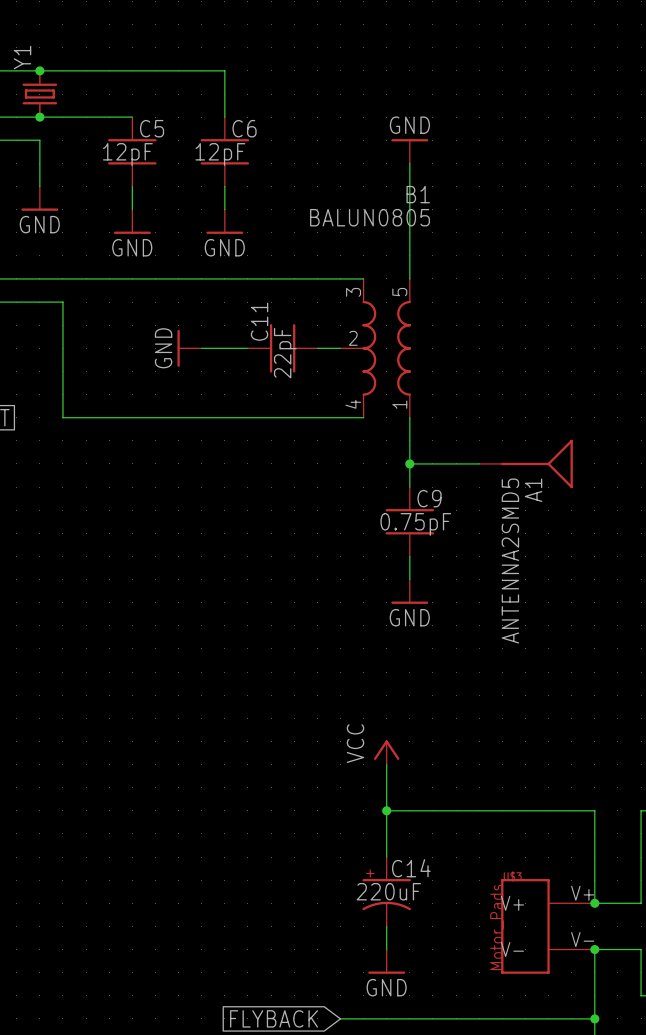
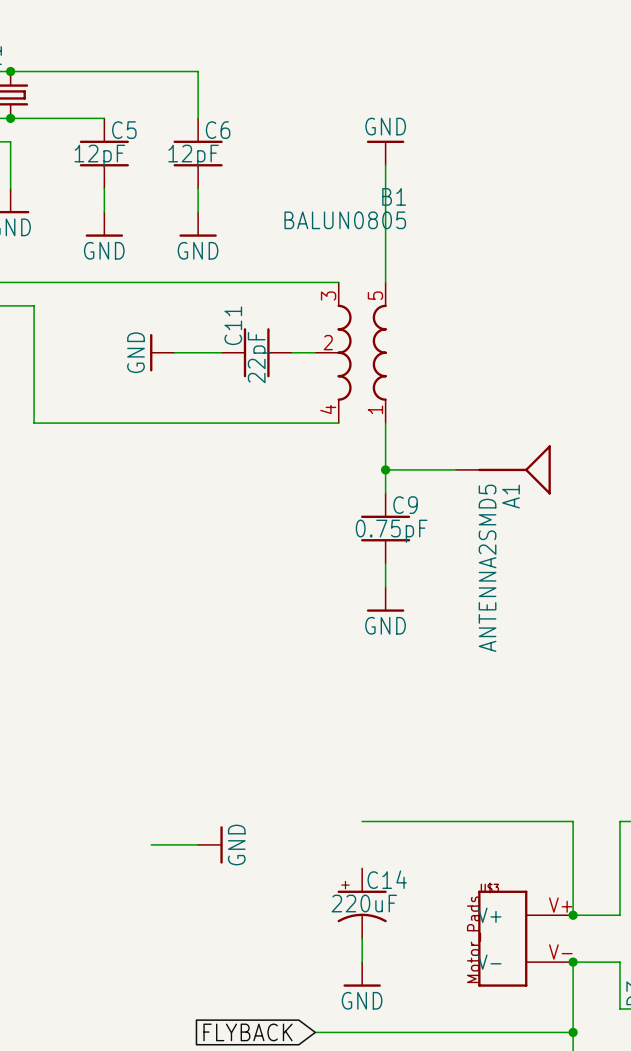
power symbol: VCC (386, 752) -> none
wire: (386, 764) (386, 857) -> none
junction: (386, 810) -> none
wire: none -> (151, 844) (198, 844)
power symbol: none -> GND (210, 844)

